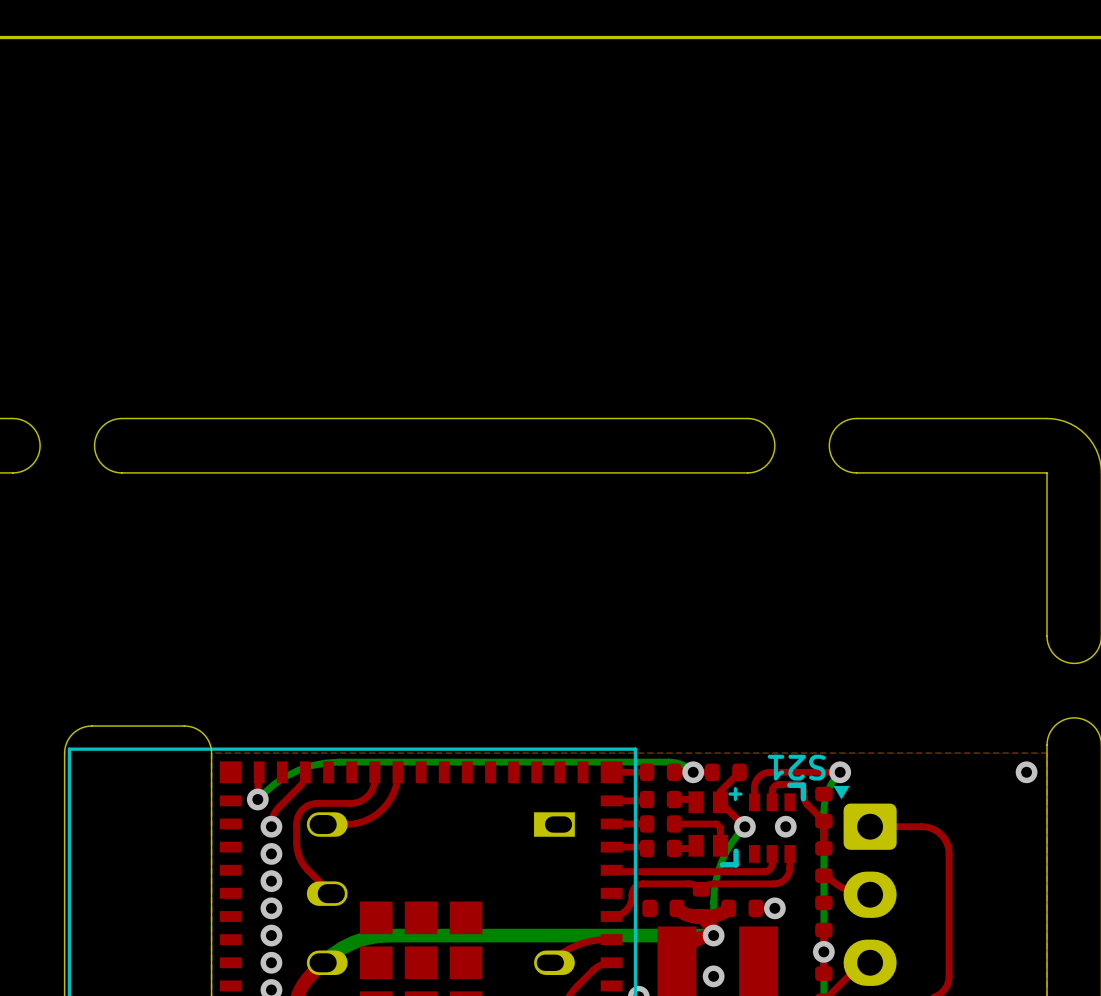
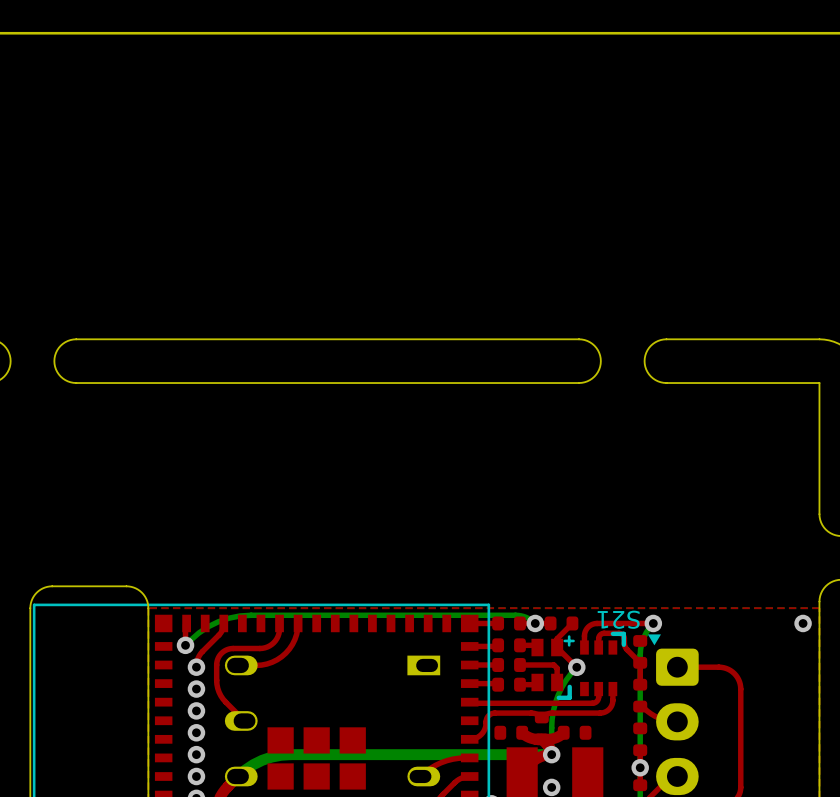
via: (785, 826) -> none
via: (774, 908) -> none

